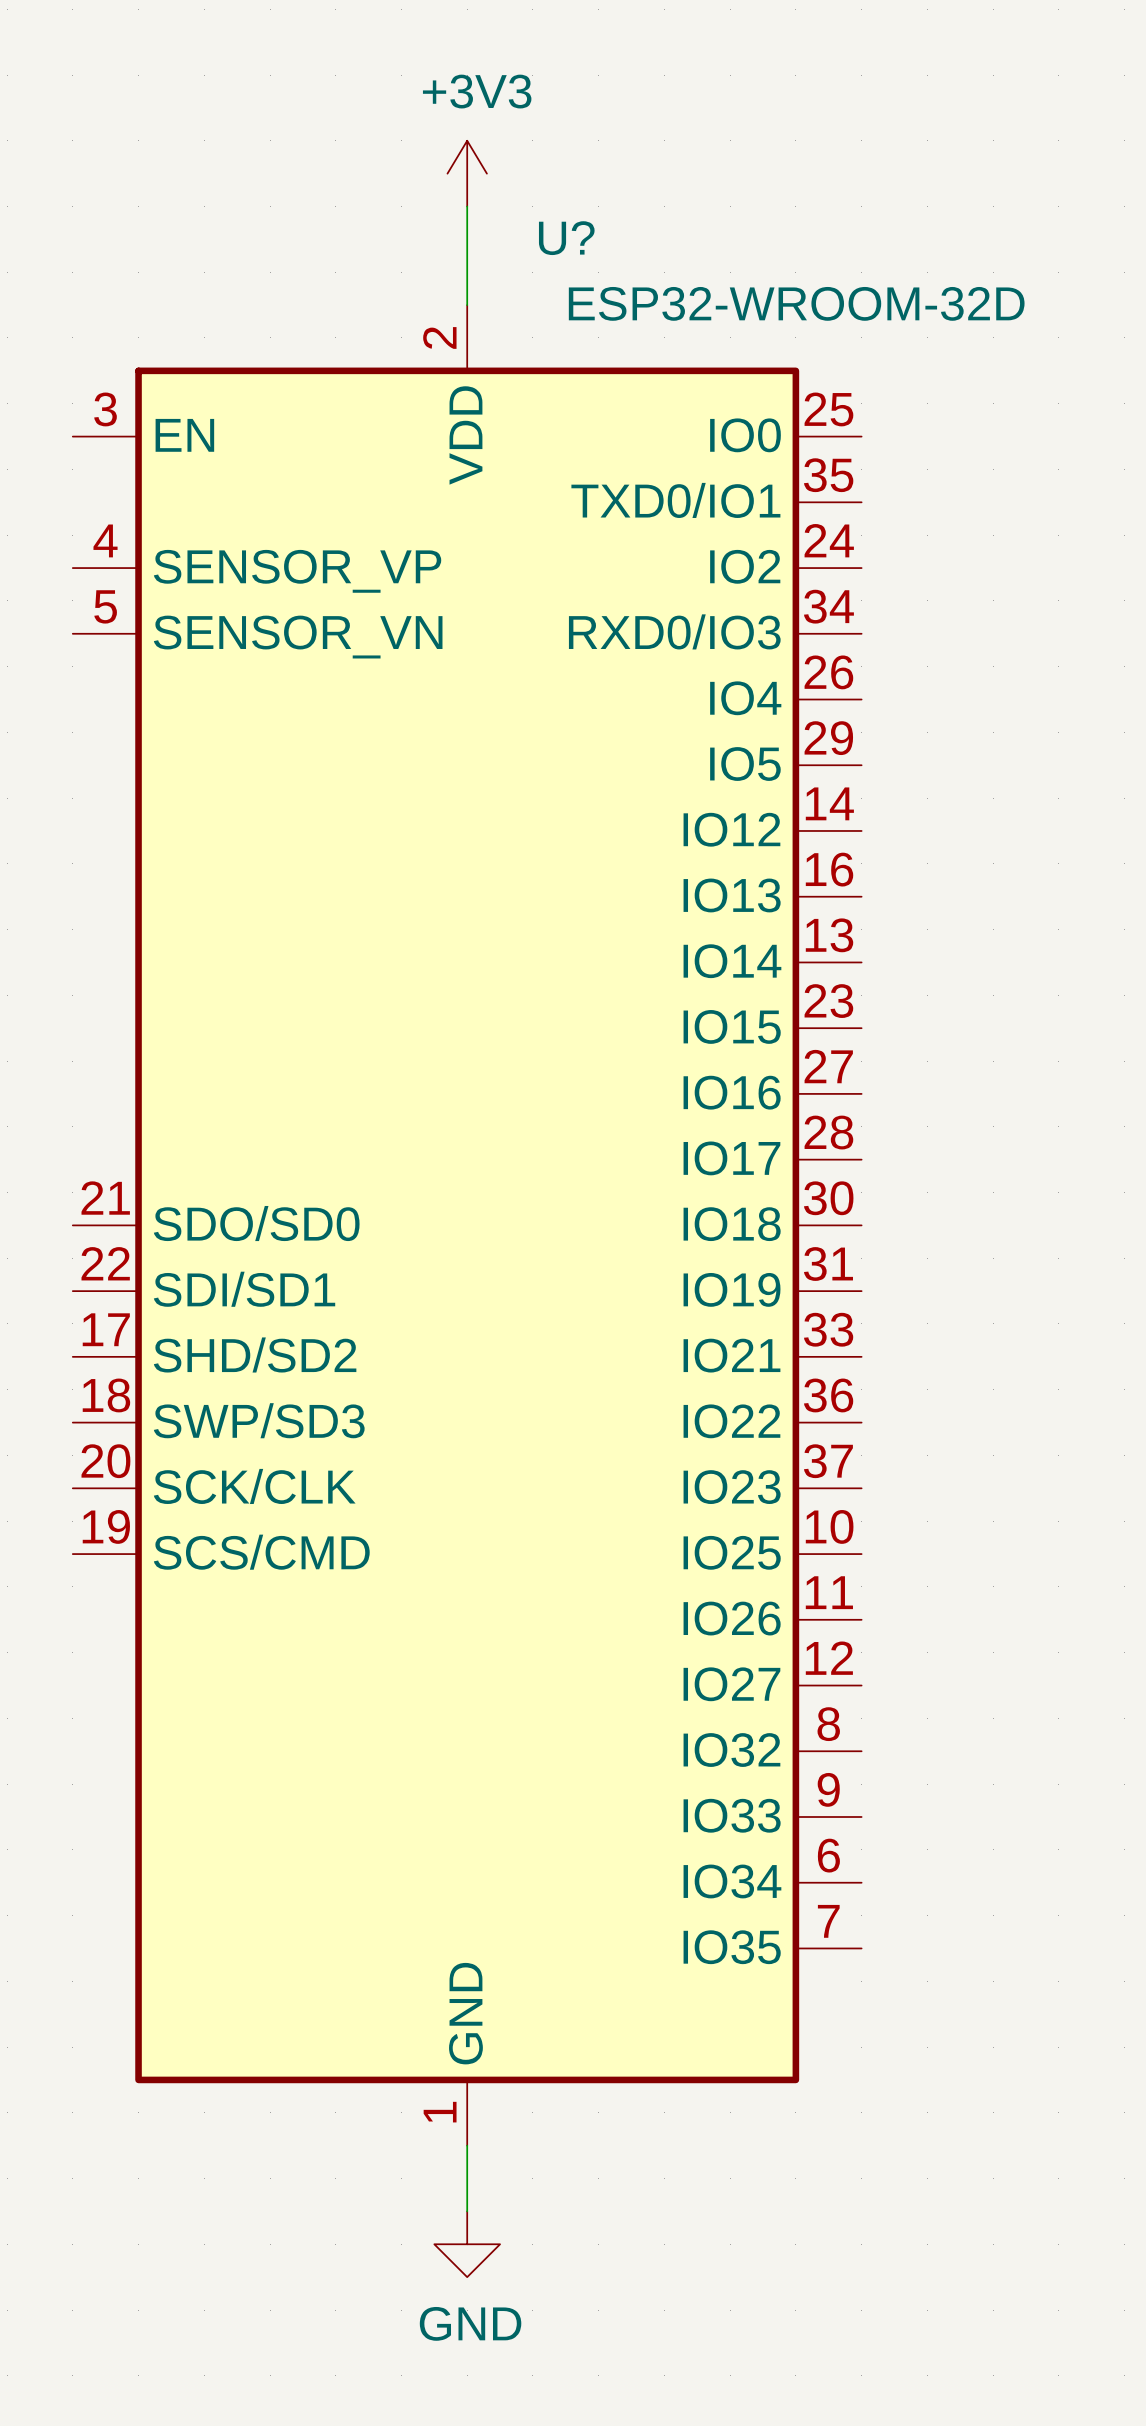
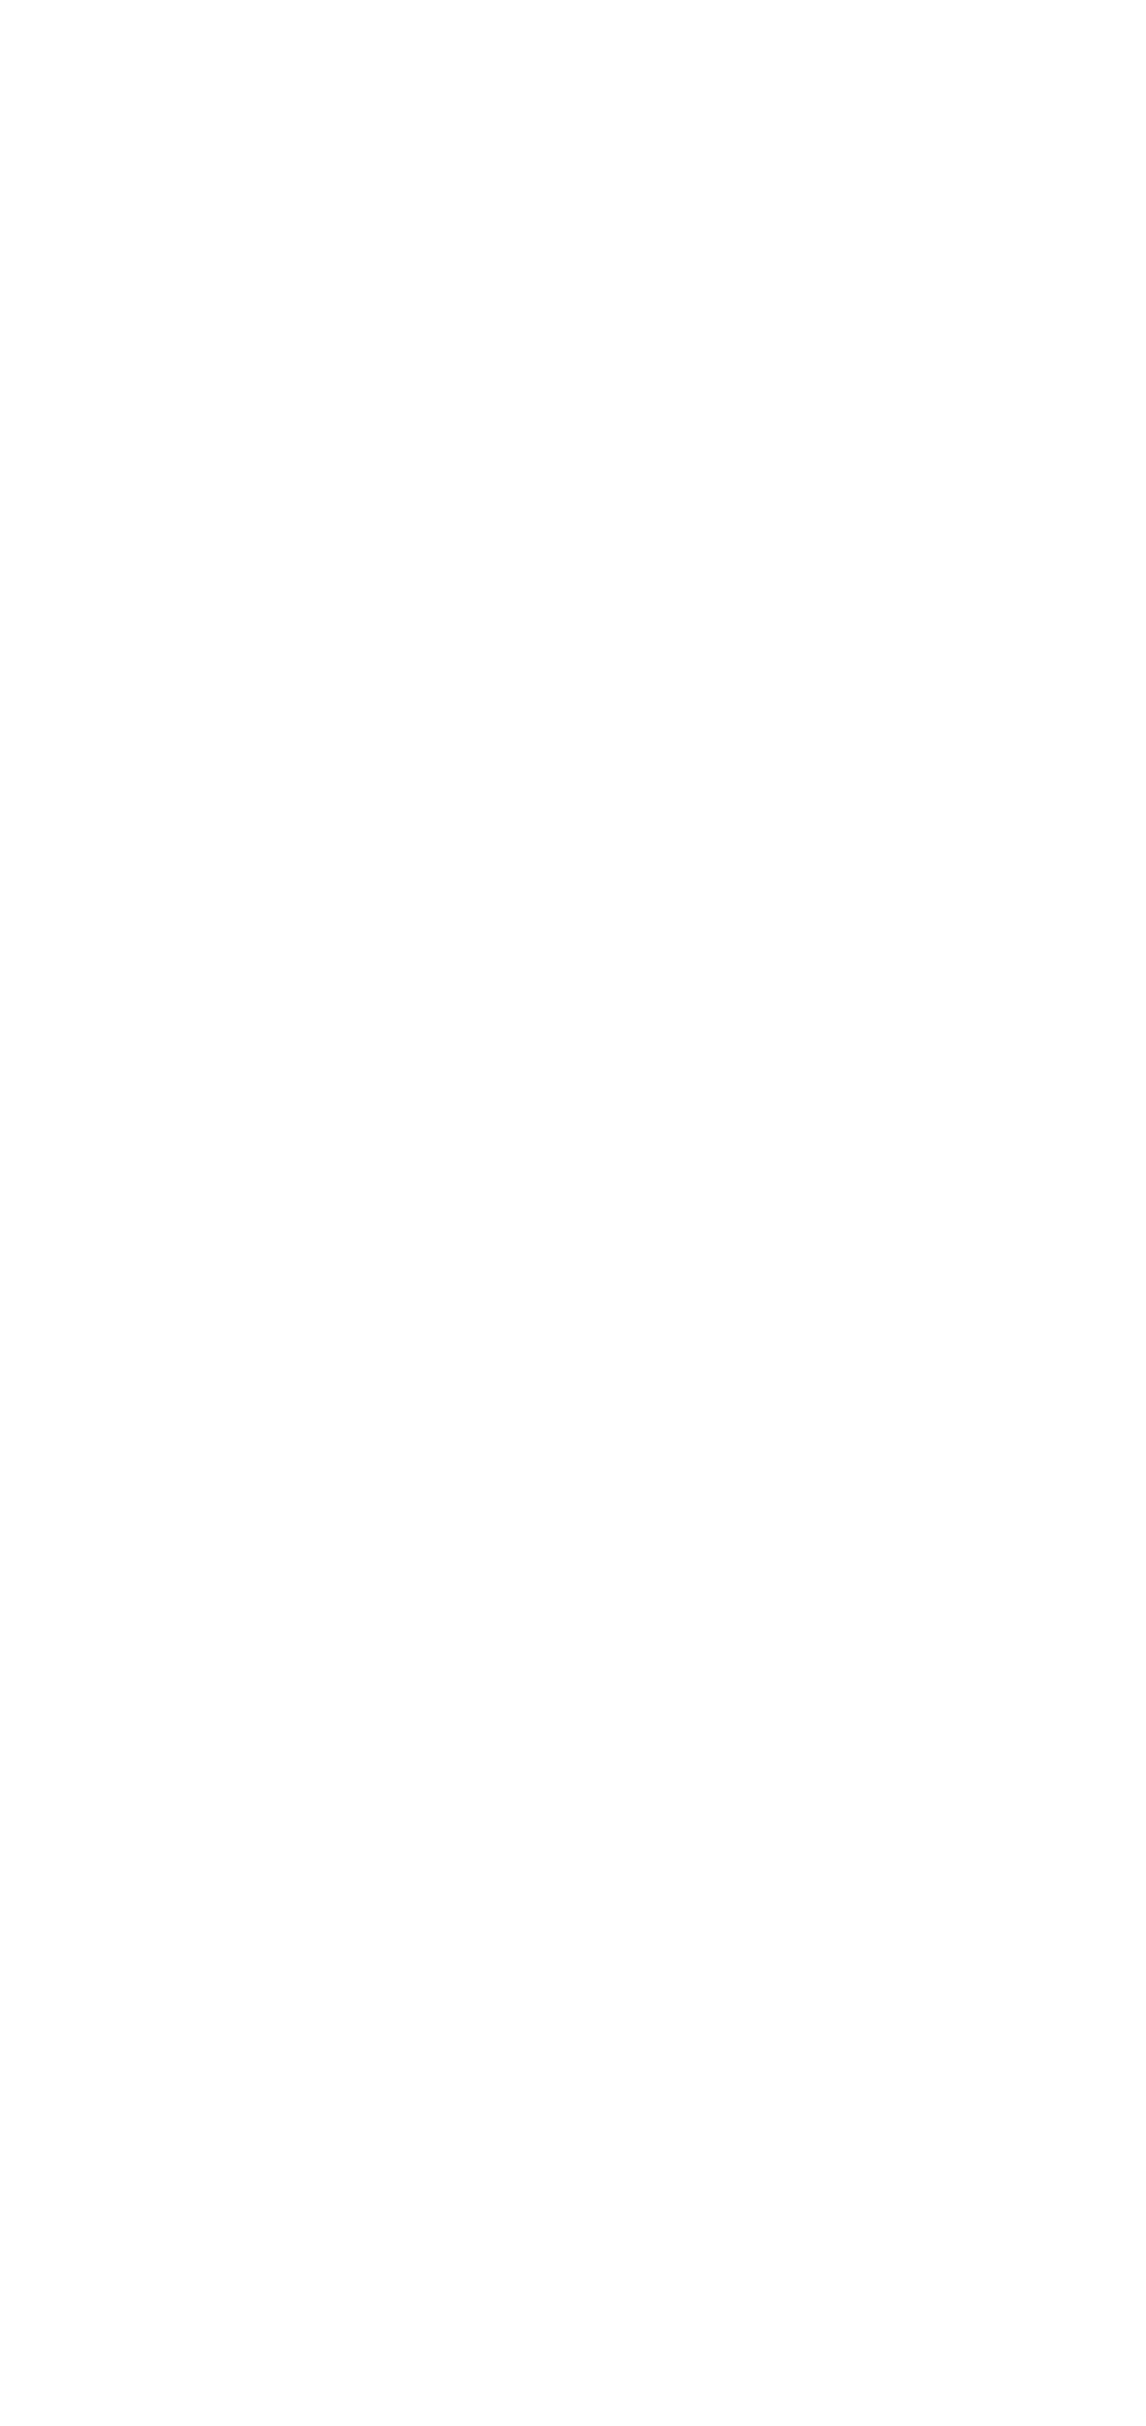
power symbol: +3V3 (467, 173) -> none
wire: (467, 206) (467, 305) -> none
U?: ESP32-WROOM-32D (467, 1225) -> none
wire: (467, 2145) (467, 2211) -> none
power symbol: GND (467, 2244) -> none

